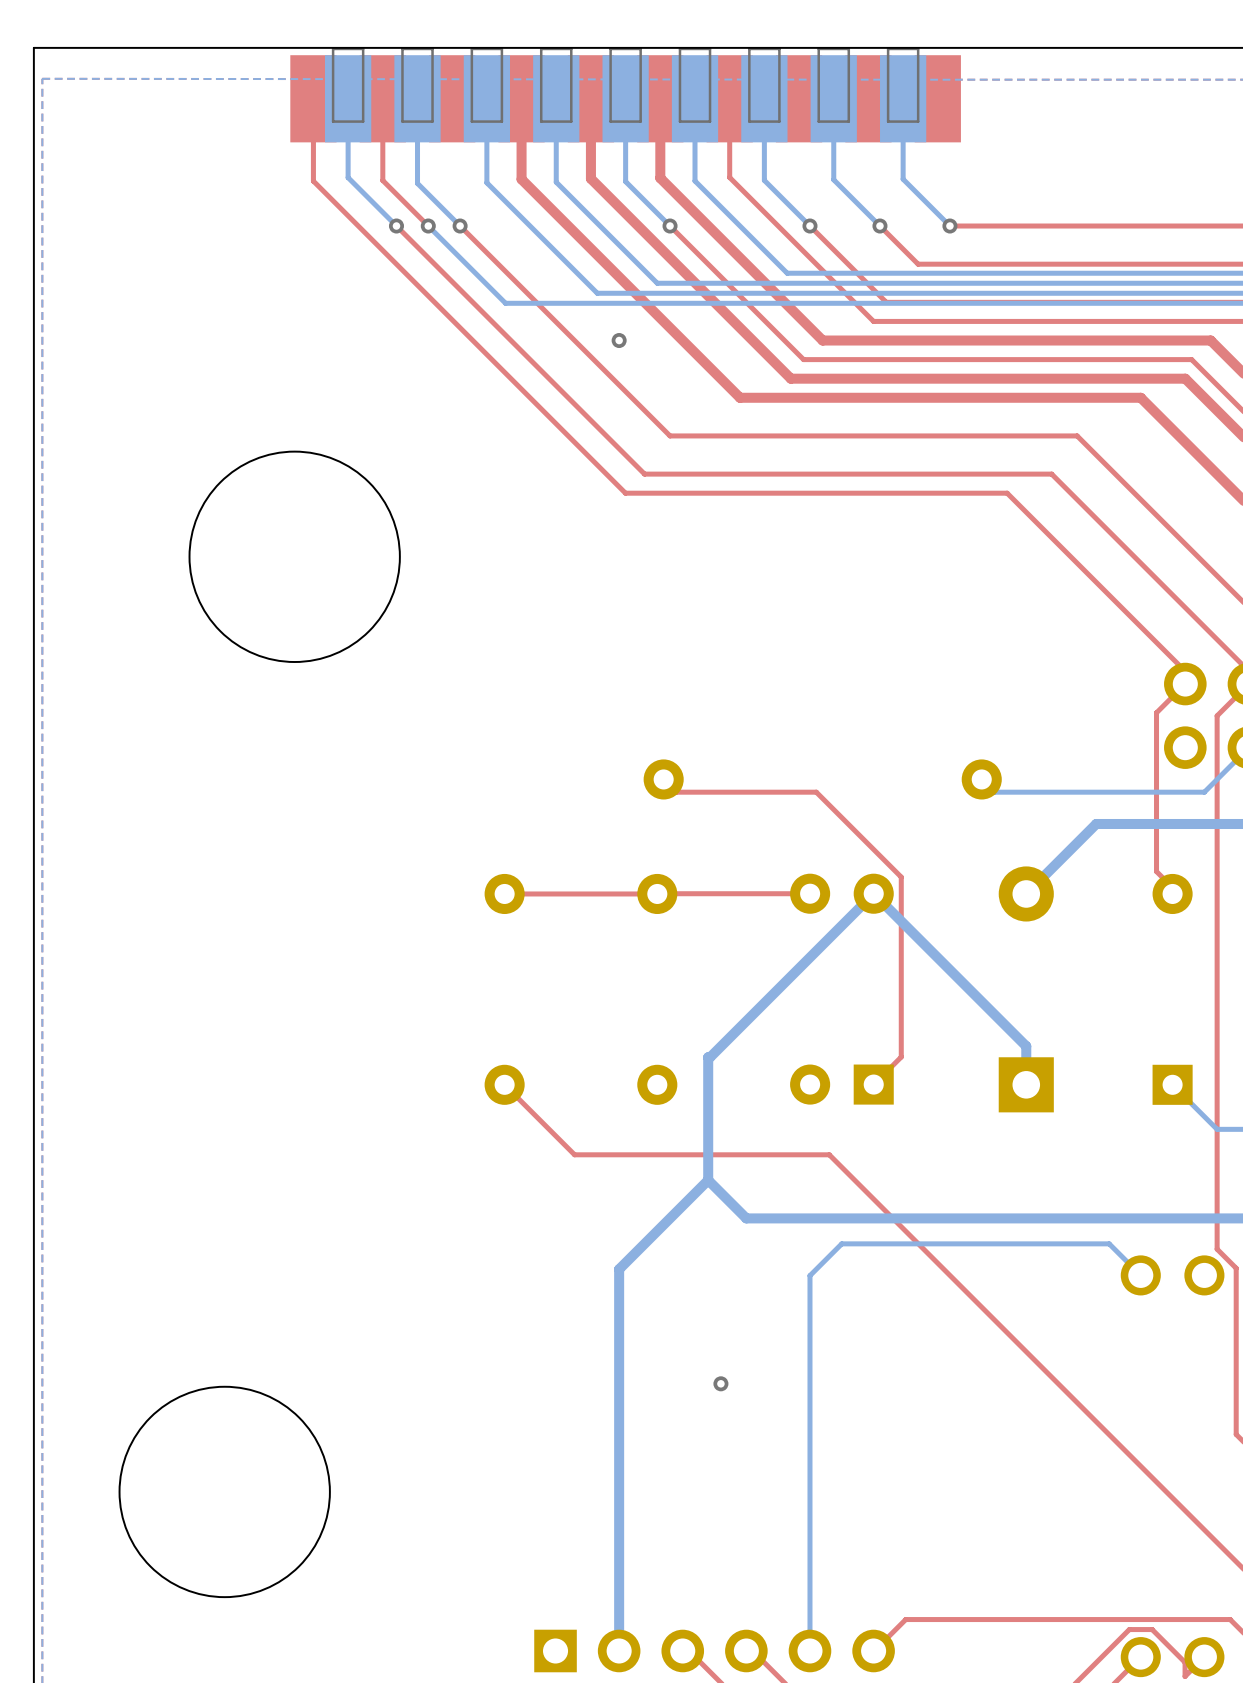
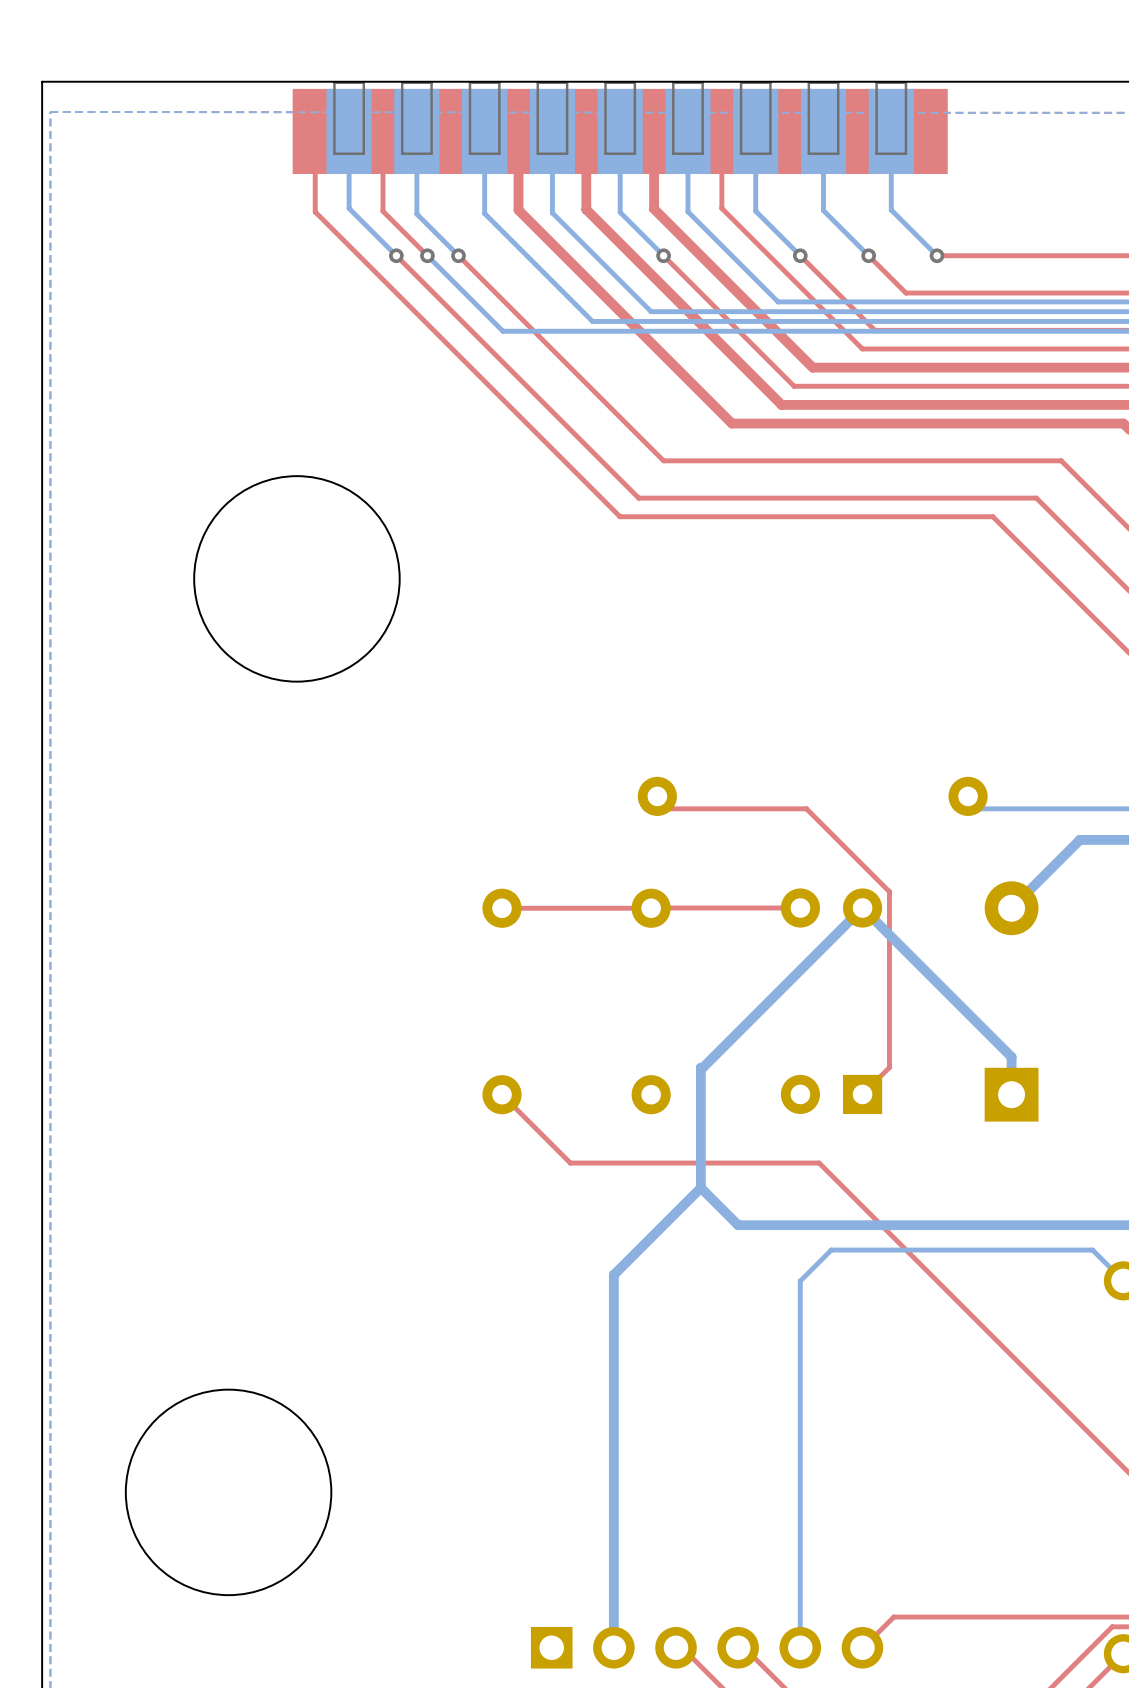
via: (619, 340) -> none
via: (720, 1383) -> none

